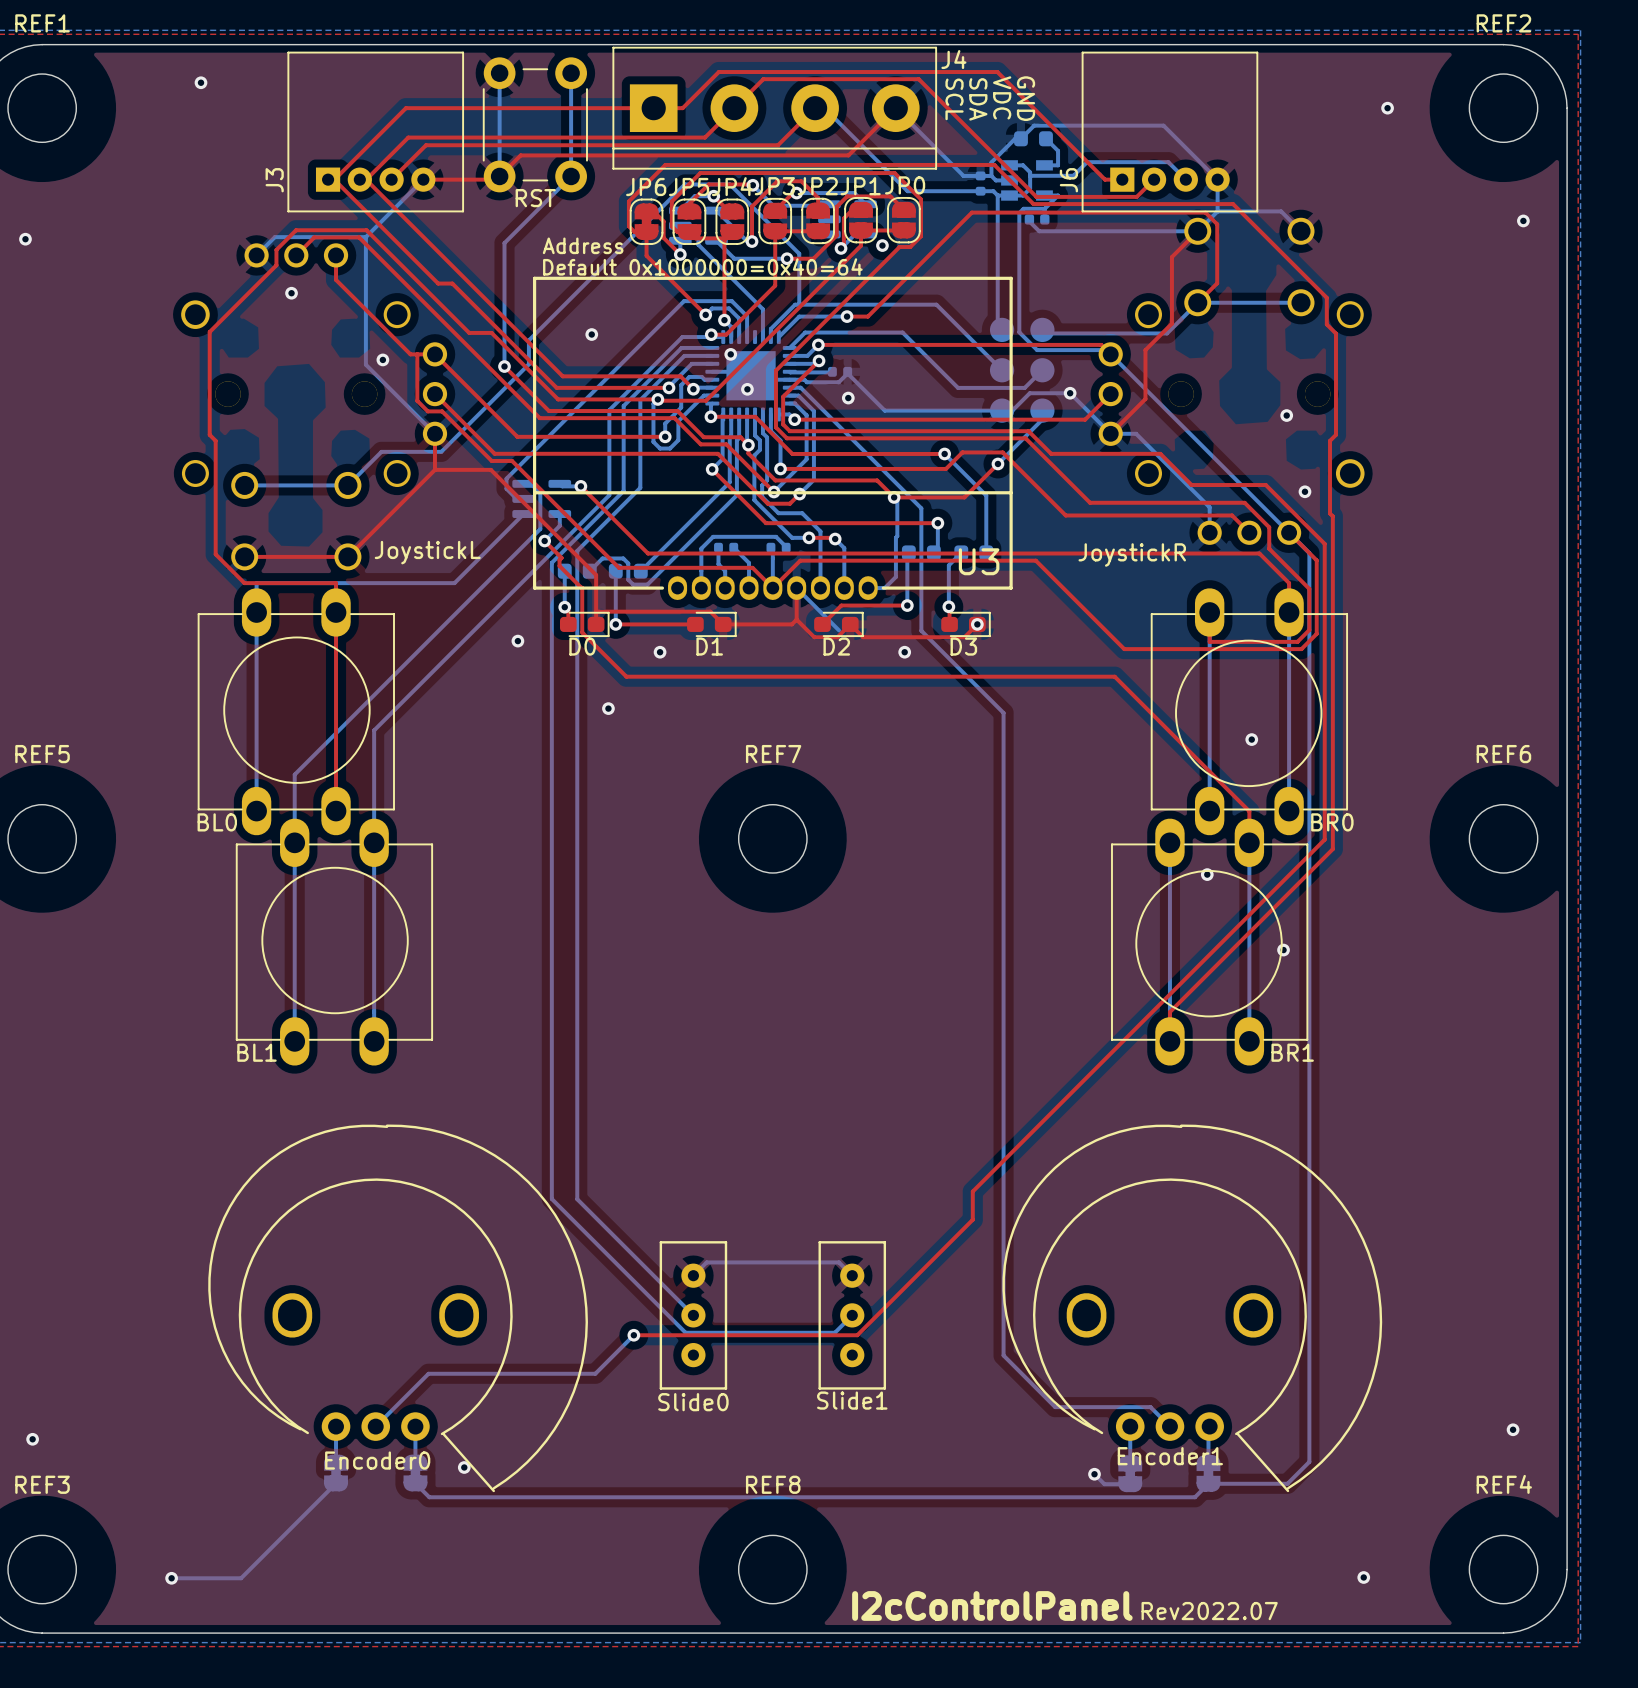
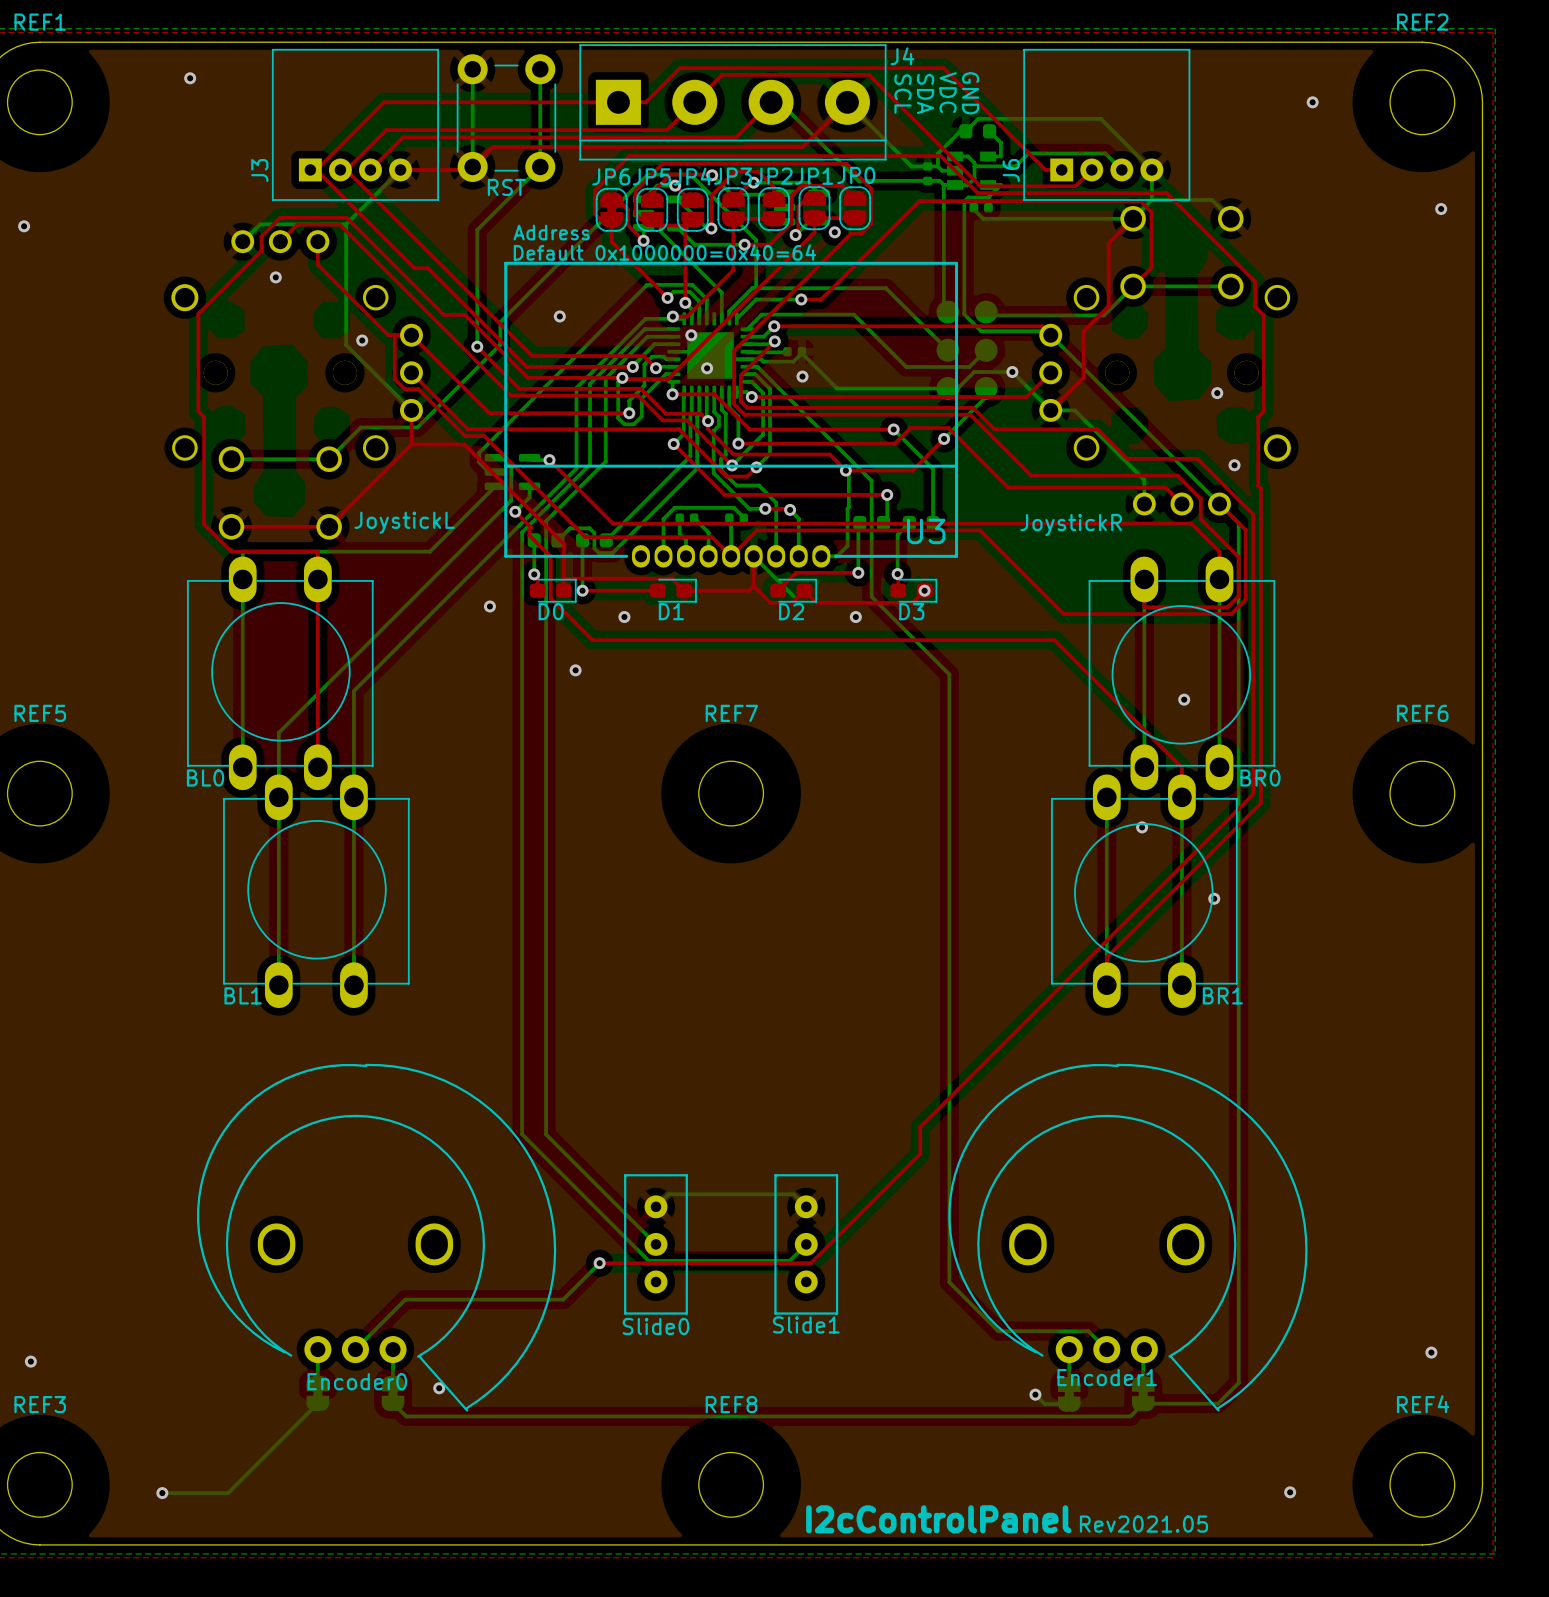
text: Rev2022.07 (1209, 1611) -> Rev2021.05 (1143, 1524)

